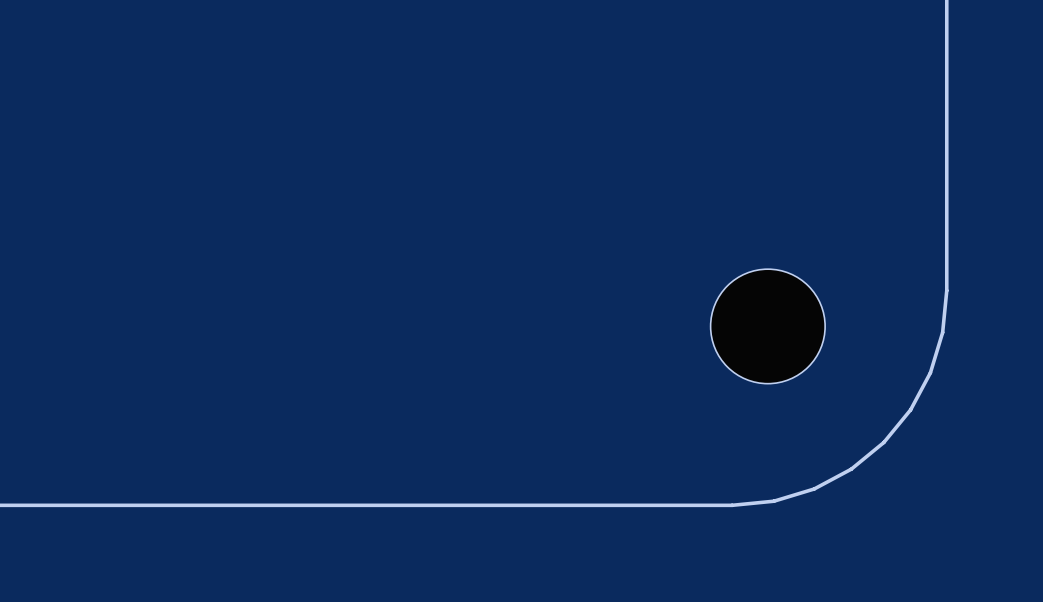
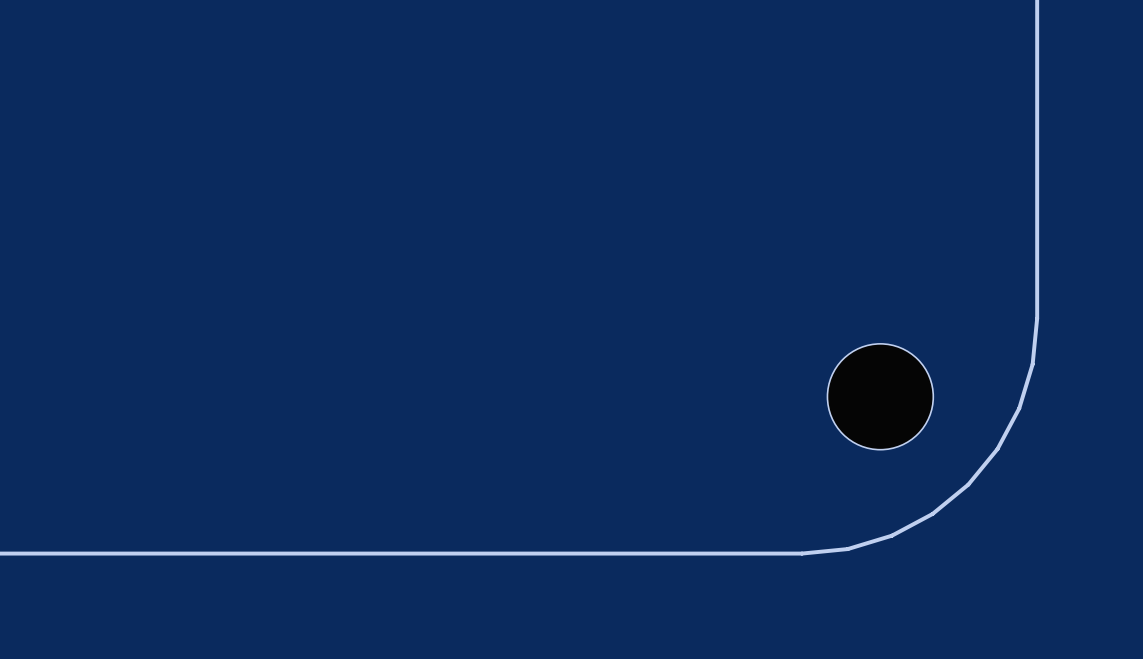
part: (767, 326) -> none
part: none -> (880, 396)

